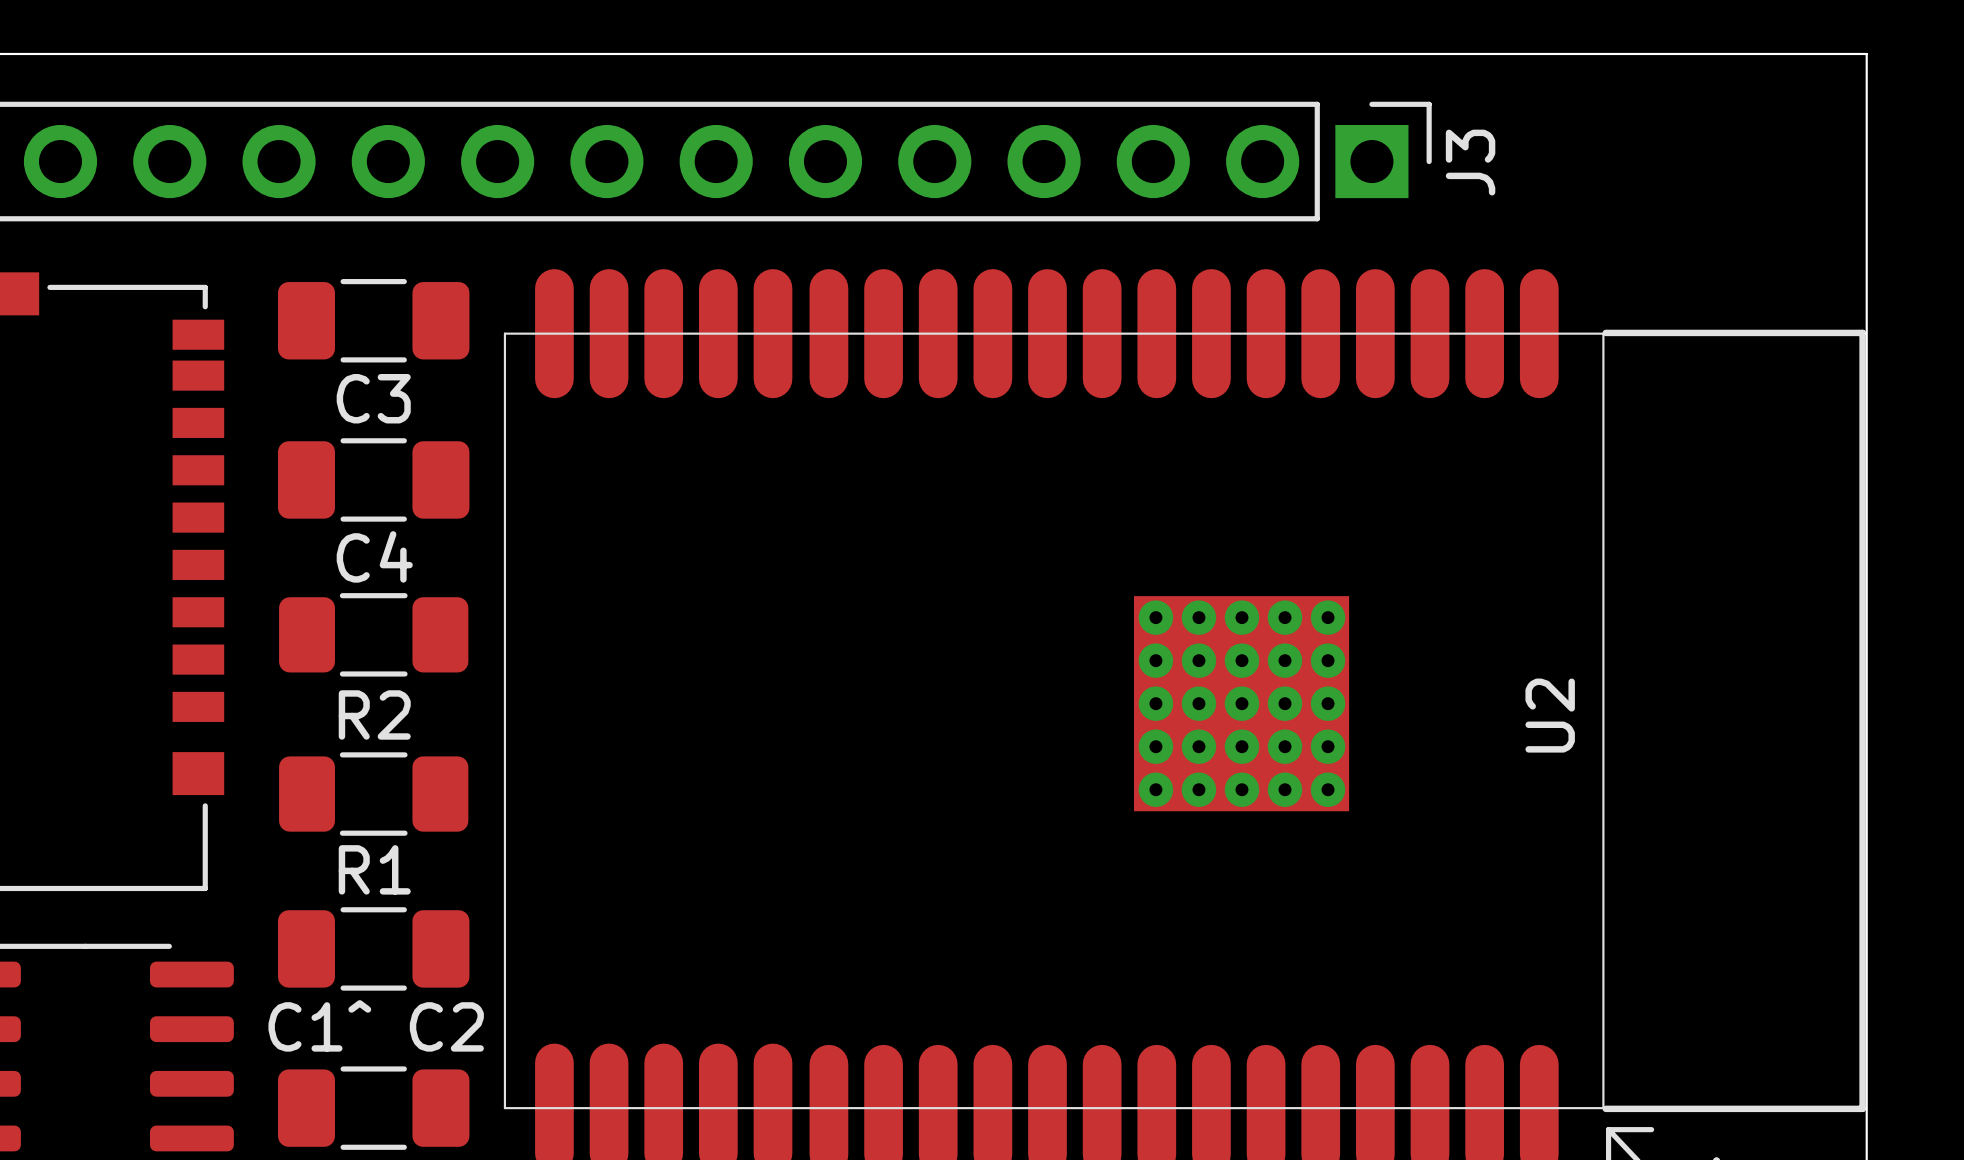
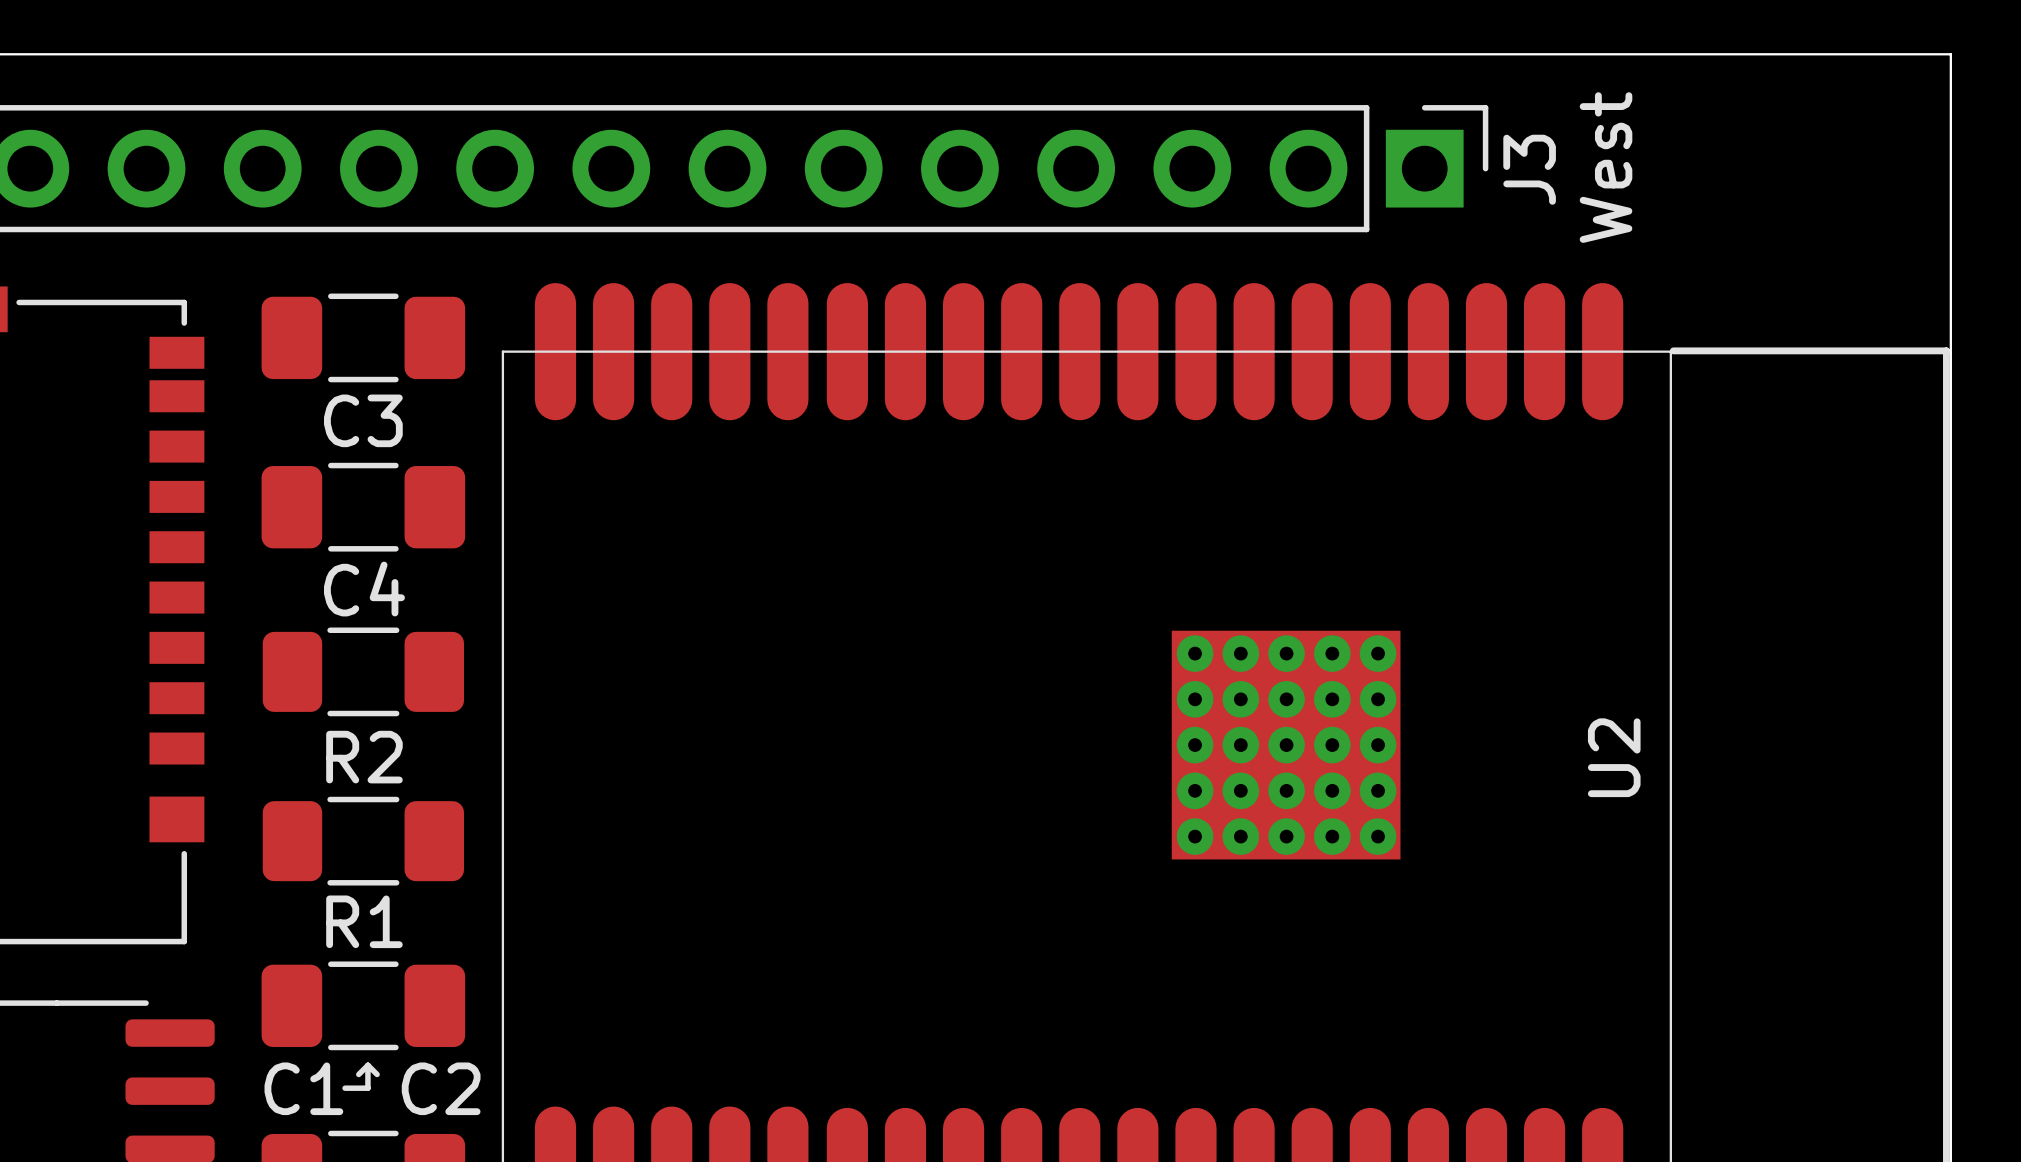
J3 value: none -> West (1606, 167)
line: none -> (367, 1065) (377, 1074)
line: none -> (367, 1065) (358, 1074)
line: none -> (367, 1065) (367, 1088) (345, 1088)
C1^ name: C1^ (319, 1025) -> C1 (303, 1088)

